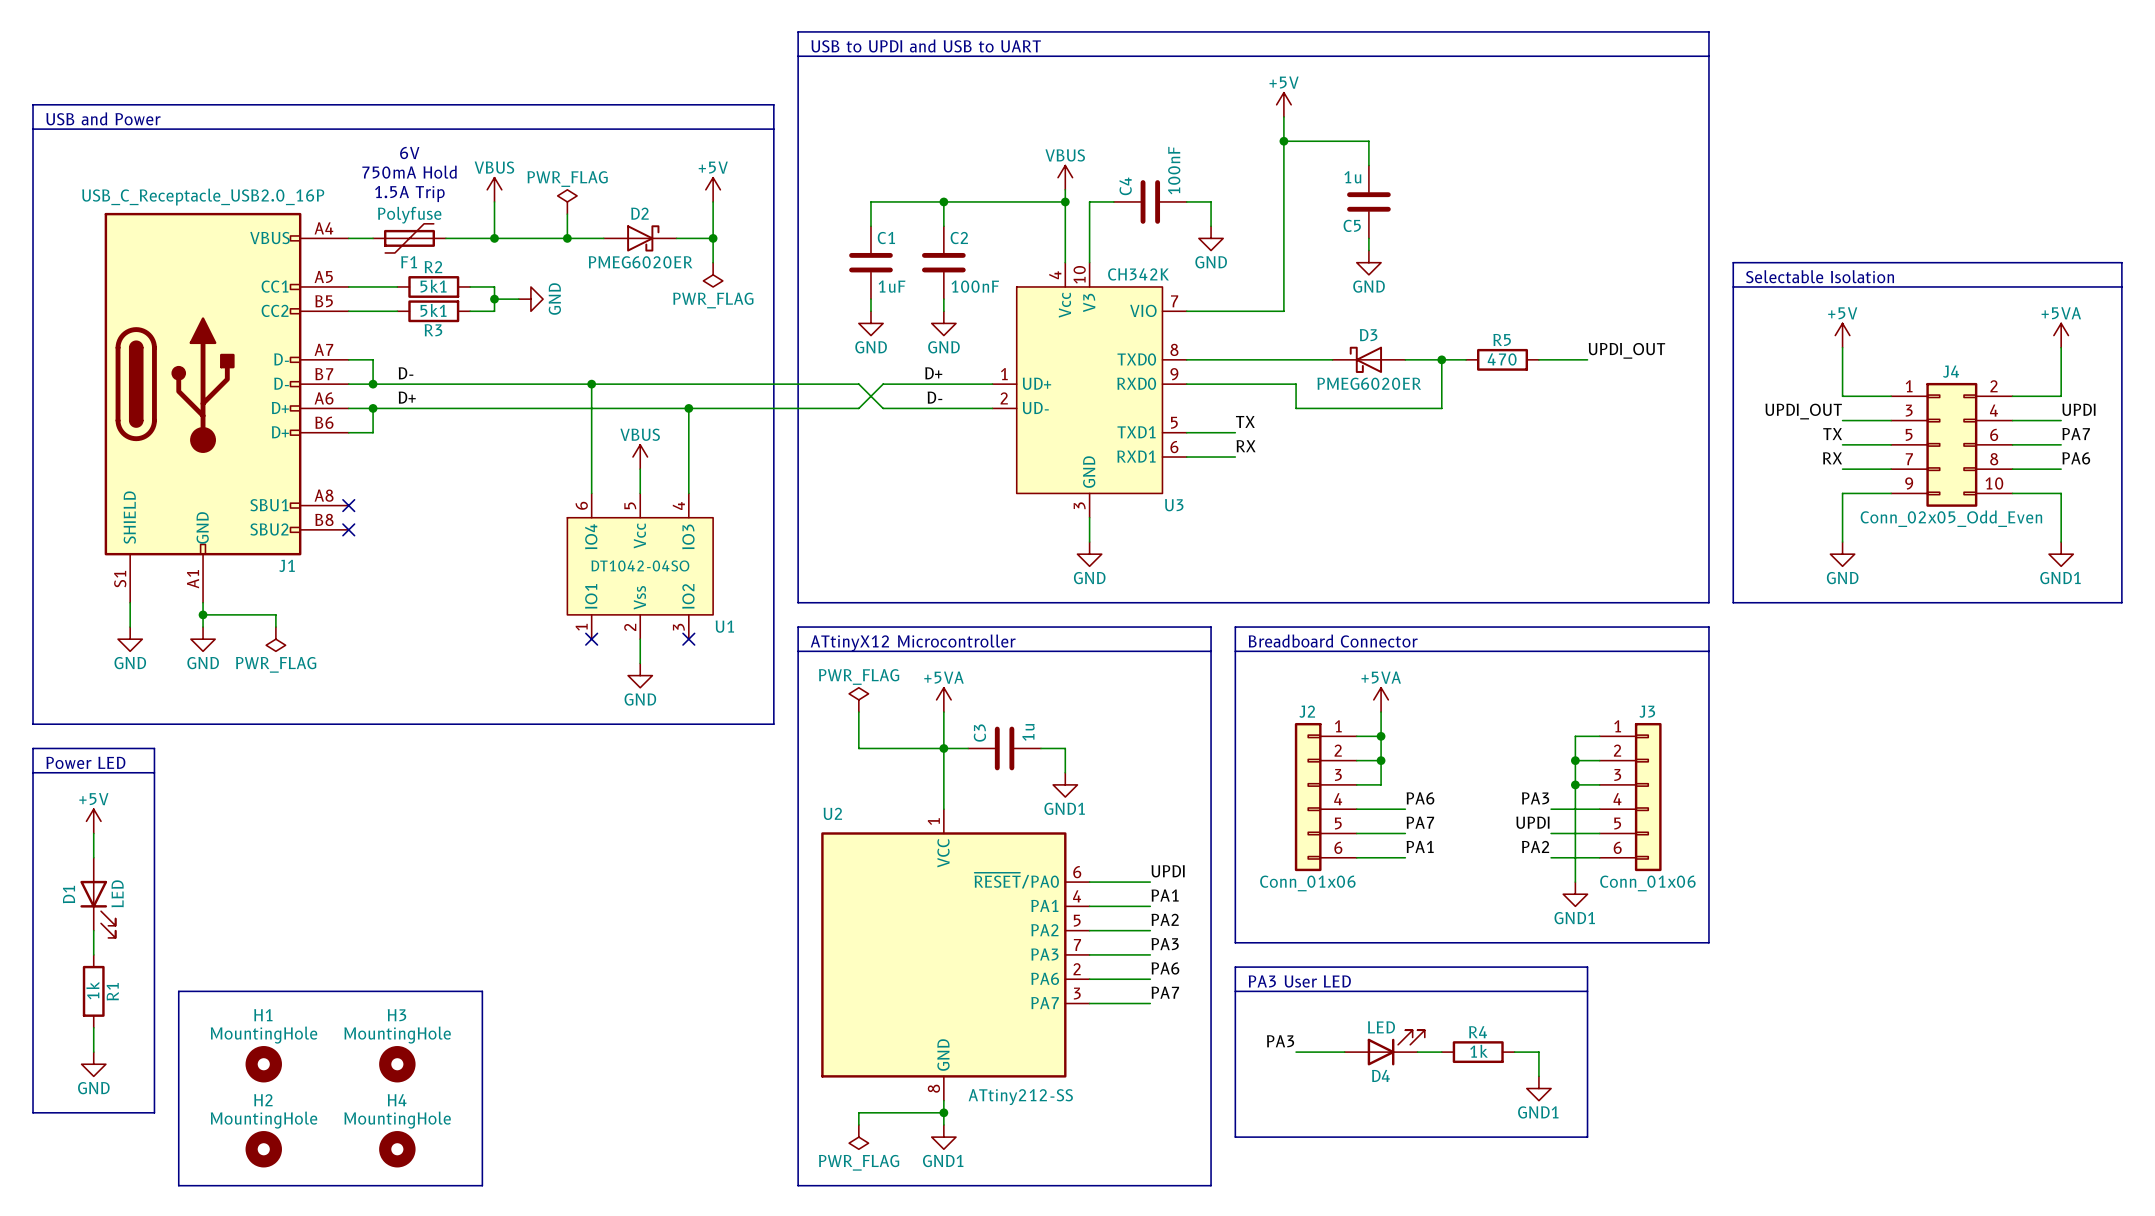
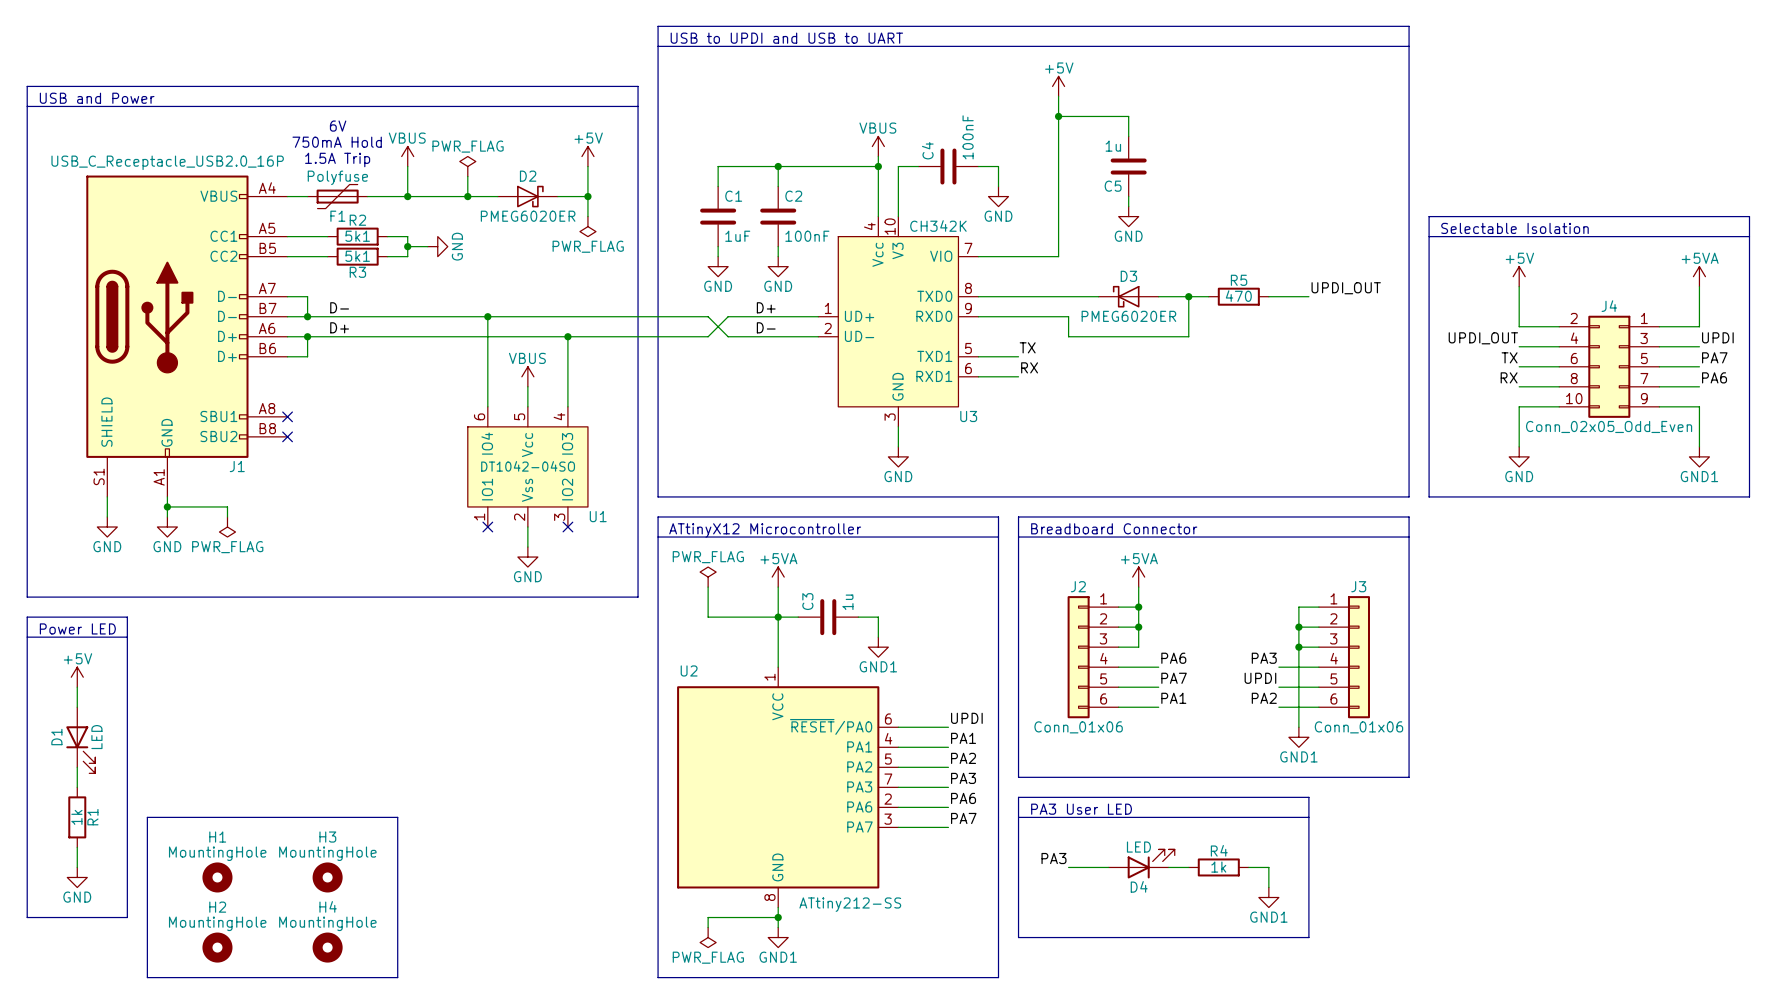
J4 flip: as is (1951, 444) -> left-right (1609, 366)

